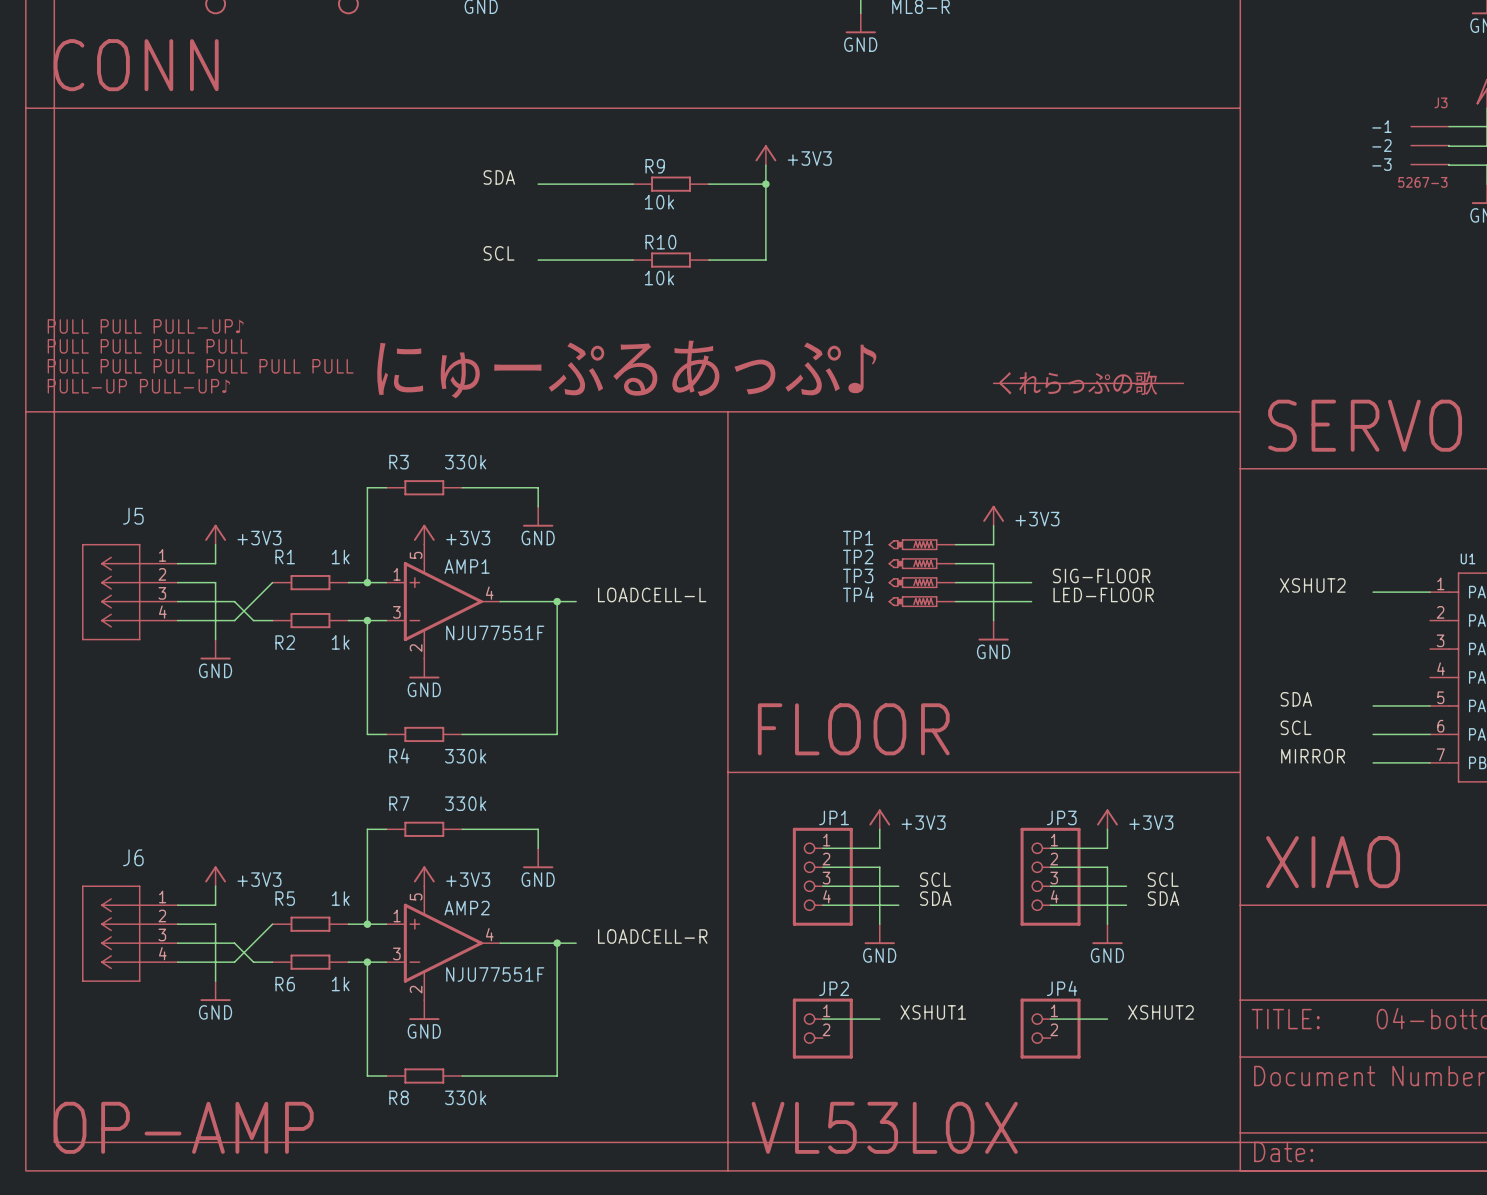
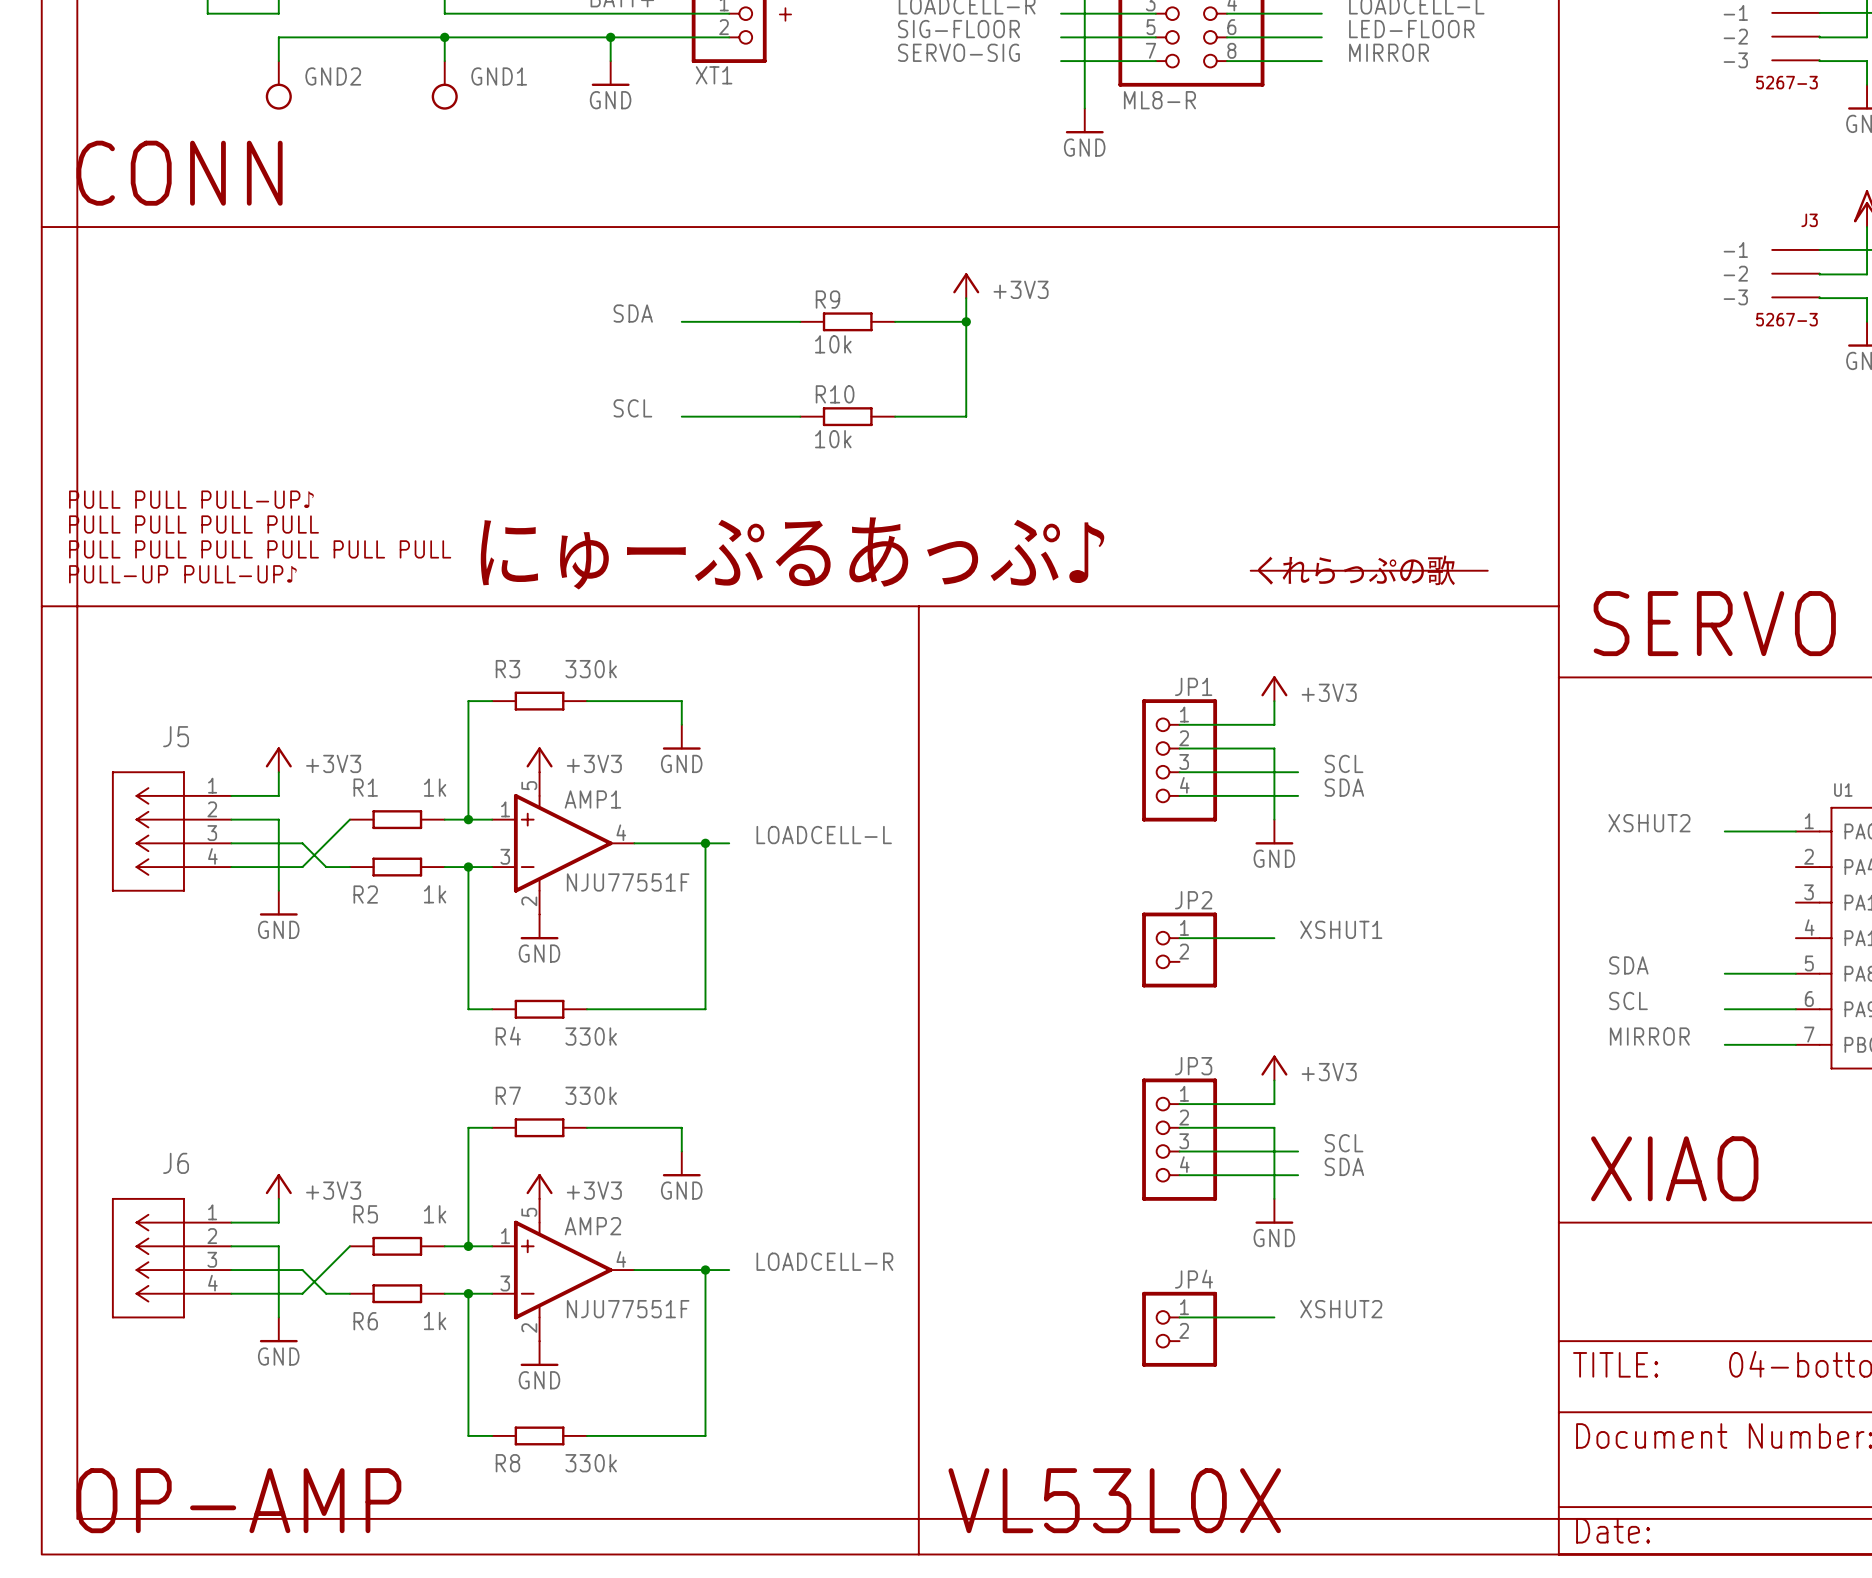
wire: none -> (1274, 701) (1274, 724) (1179, 724)
power symbol position: +3V3 (993, 515) -> +3V3 (1274, 688)
wire: none -> (1179, 748) (1274, 748) (1274, 819)
wire: (993, 525) (993, 544) -> (1298, 772) (1250, 772)
label: none -> SCL (1344, 763)
TP1: (922, 544) -> none
label: none -> SDA (1344, 787)
TP2: (922, 563) -> none
wire: (993, 563) (993, 620) -> (1250, 795) (1298, 795)
label: SIG-FLOOR (1101, 575) -> none
TP3: (922, 582) -> none
wire: (955, 582) (1031, 582) -> none
label: LED-FLOOR (1103, 594) -> none
TP4: (922, 601) -> none
wire: (955, 601) (1031, 601) -> (1179, 938) (1274, 938)
power symbol position: GND (993, 630) -> GND (1274, 832)
label: none -> XSHUT1 (1341, 929)
text: FLOOR (853, 729) -> none
line: (727, 772) (1240, 772) -> none
power symbol: none -> +3V3 (1274, 1067)
wire: none -> (1274, 1080) (1274, 1104) (1179, 1104)
power symbol: +3V3 (879, 819) -> none
power symbol: +3V3 (1107, 819) -> none
wire: (879, 829) (879, 848) (822, 848) -> none
wire: none -> (1179, 1127) (1274, 1127) (1274, 1198)
wire: (1107, 829) (1107, 848) (1050, 848) -> none
label: none -> SCL (1344, 1143)
wire: none -> (1179, 1151) (1298, 1151)
label: none -> SDA (1344, 1166)
wire: (822, 867) (879, 867) (879, 924) -> none
wire: none -> (1179, 1175) (1298, 1175)
wire: (1050, 867) (1107, 867) (1107, 924) -> none
JP1 position: (822, 876) -> (1179, 760)
JP3 position: (1050, 876) -> (1179, 1139)
label: SCL (935, 879) -> none
label: SCL (1163, 879) -> none
wire: (822, 886) (898, 886) -> none
wire: (1050, 886) (1126, 886) -> none
power symbol: none -> GND (1274, 1211)
label: SDA (935, 898) -> none
label: SDA (1163, 898) -> none
wire: (822, 905) (898, 905) -> none
wire: (1050, 905) (1126, 905) -> (1179, 1317) (1274, 1317)
power symbol: GND (879, 934) -> none
power symbol: GND (1107, 934) -> none
label: XSHUT1 (933, 1012) -> none
label position: XSHUT2 (1161, 1012) -> XSHUT2 (1341, 1309)
wire: (822, 1019) (879, 1019) -> none
wire: (1050, 1019) (1107, 1019) -> none
JP2 position: (822, 1028) -> (1179, 950)
JP4 position: (1050, 1028) -> (1179, 1329)

